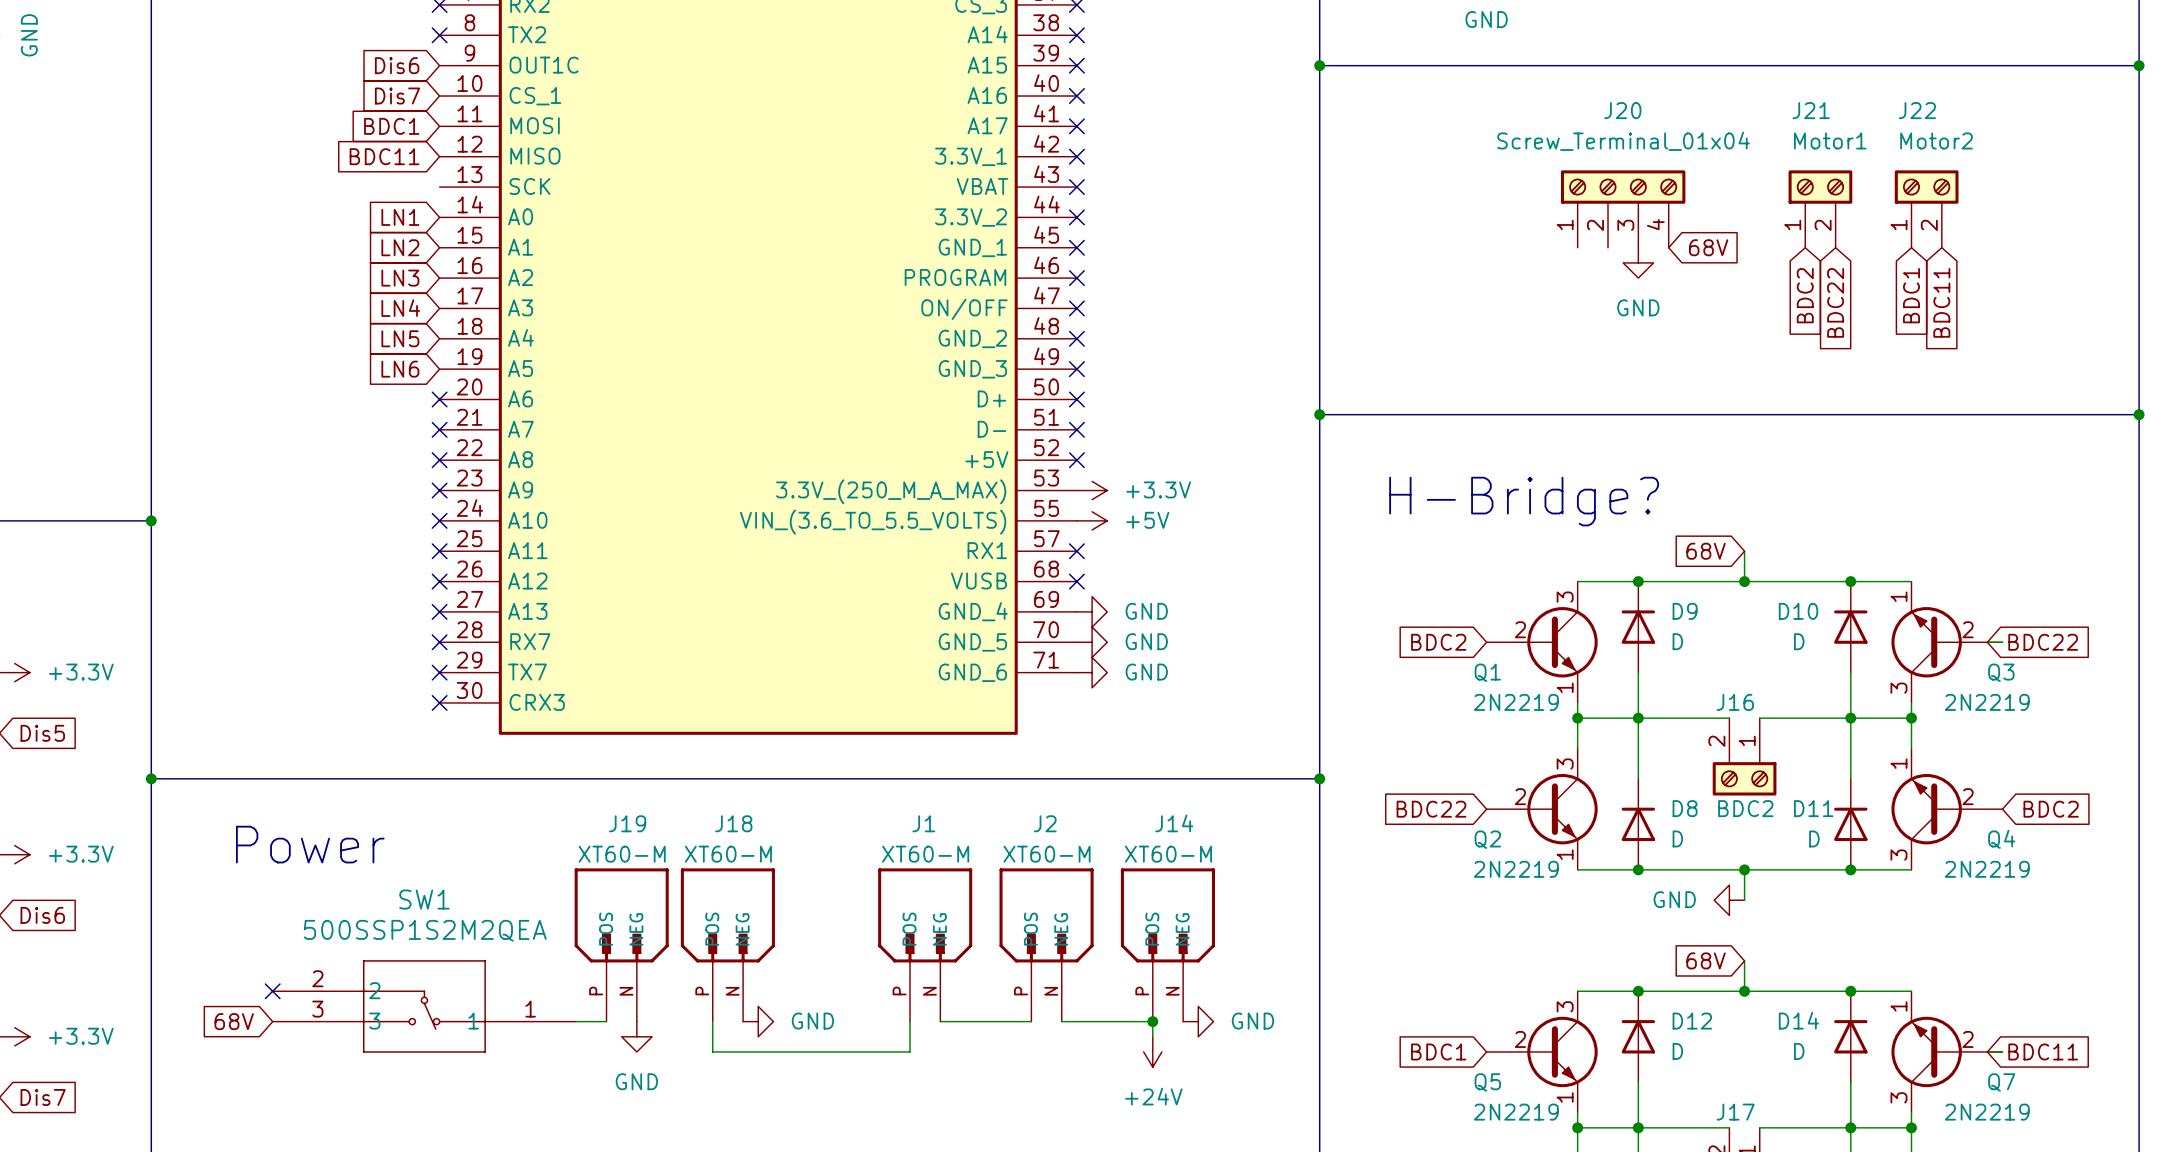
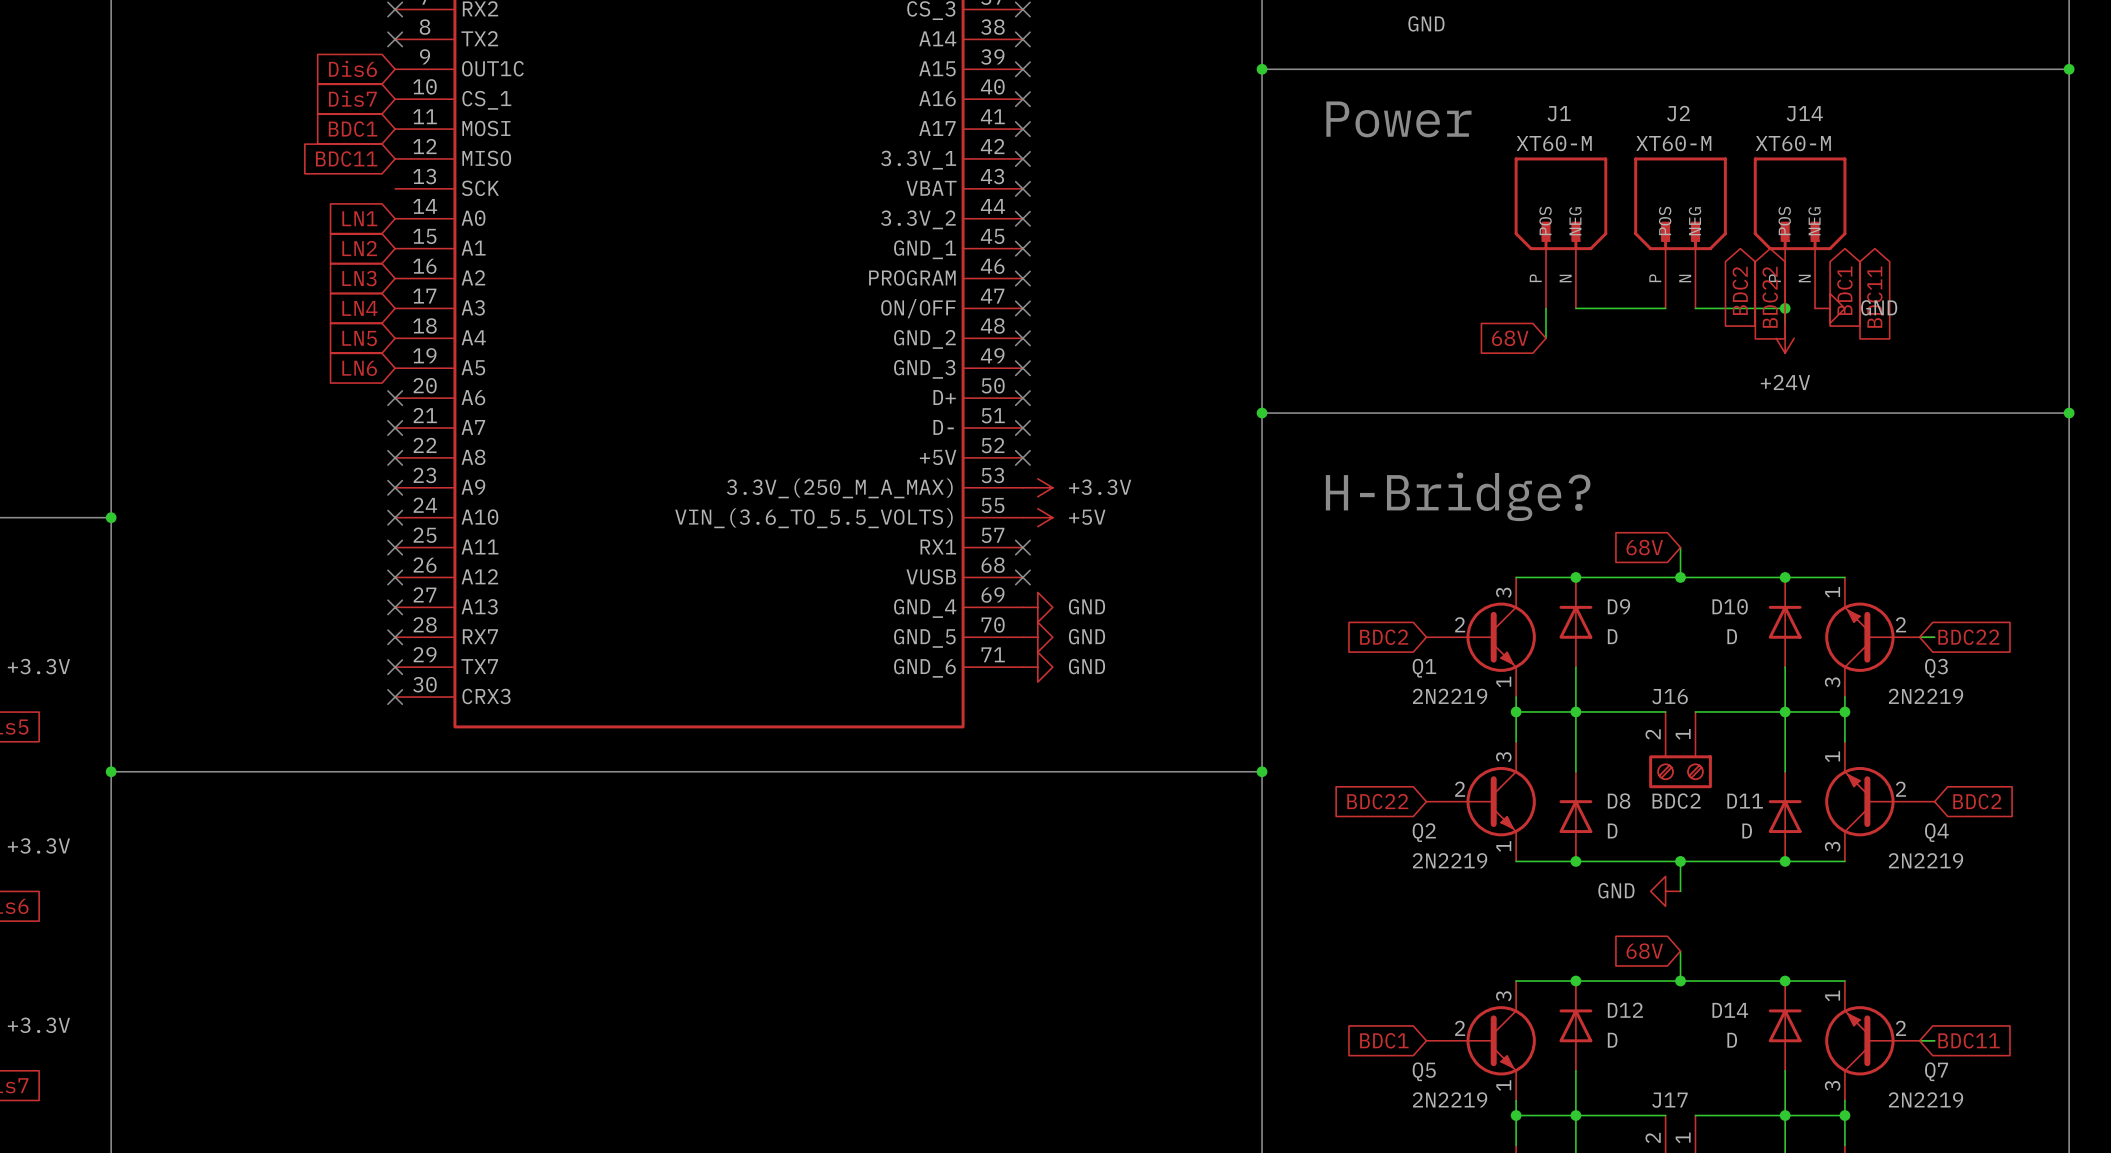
text: none -> Power (1398, 119)
J20: Screw_Terminal_01x04 (1623, 209) -> none
J21: Motor1 (1820, 209) -> none
J22: Motor2 (1926, 209) -> none
global label rotation: 0° (1708, 247) -> 180° (1510, 338)
global label position: 68V (1708, 247) -> 68V (1510, 338)
power symbol rotation: 0° (1638, 262) -> 90° counterclockwise (1829, 308)
power symbol position: GND (1638, 262) -> GND (1829, 308)
wire: none -> (1546, 308) (1546, 338)
wire: none -> (1575, 308) (1665, 308)
wire: none -> (1695, 308) (1785, 308) (1785, 323)
junction: none -> (1785, 308)
power symbol: none -> +24V (1785, 338)
text: Power (310, 844) -> none
J19: XT60-M (621, 944) -> none
J18: XT60-M (727, 944) -> none
J1 position: (925, 944) -> (1560, 232)
J2 position: (1046, 944) -> (1680, 232)
J14 position: (1167, 944) -> (1800, 232)
no-connect mark: (272, 991) -> none
SW1: 500SSP1S2M2QEA (424, 1006) -> none
global label: 68V (234, 1021) -> none
wire: (576, 1021) (606, 1021) -> none
wire: (712, 1021) (712, 1051) (910, 1051) (910, 1021) -> none
power symbol: GND (758, 1021) -> none
wire: (940, 1021) (1031, 1021) -> none
wire: (1061, 1021) (1152, 1021) (1152, 1036) -> none
junction: (1152, 1021) -> none
power symbol: GND (1198, 1021) -> none
power symbol: GND (636, 1036) -> none
power symbol: +24V (1152, 1051) -> none

